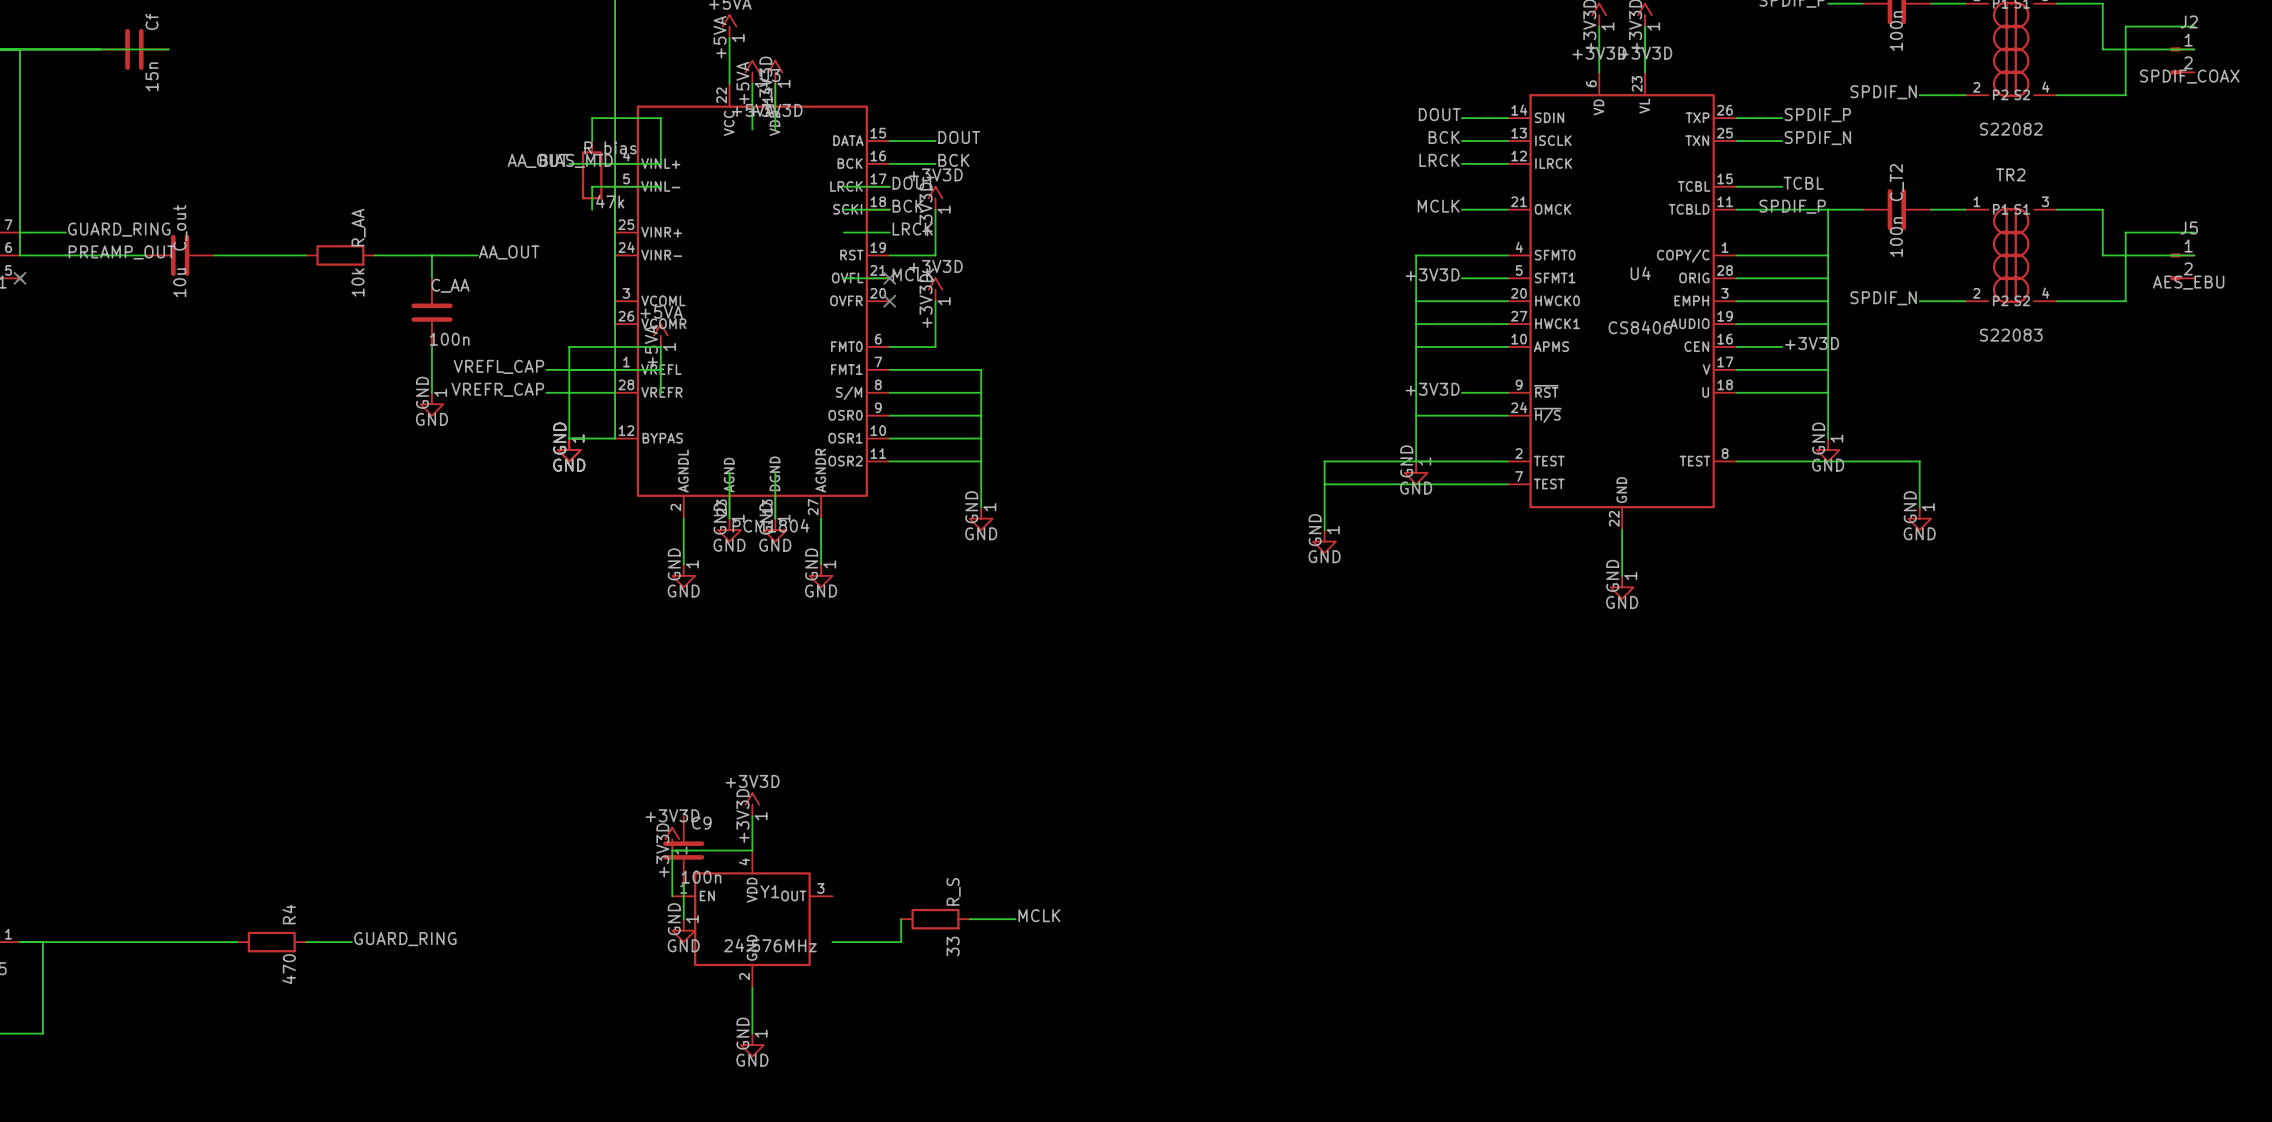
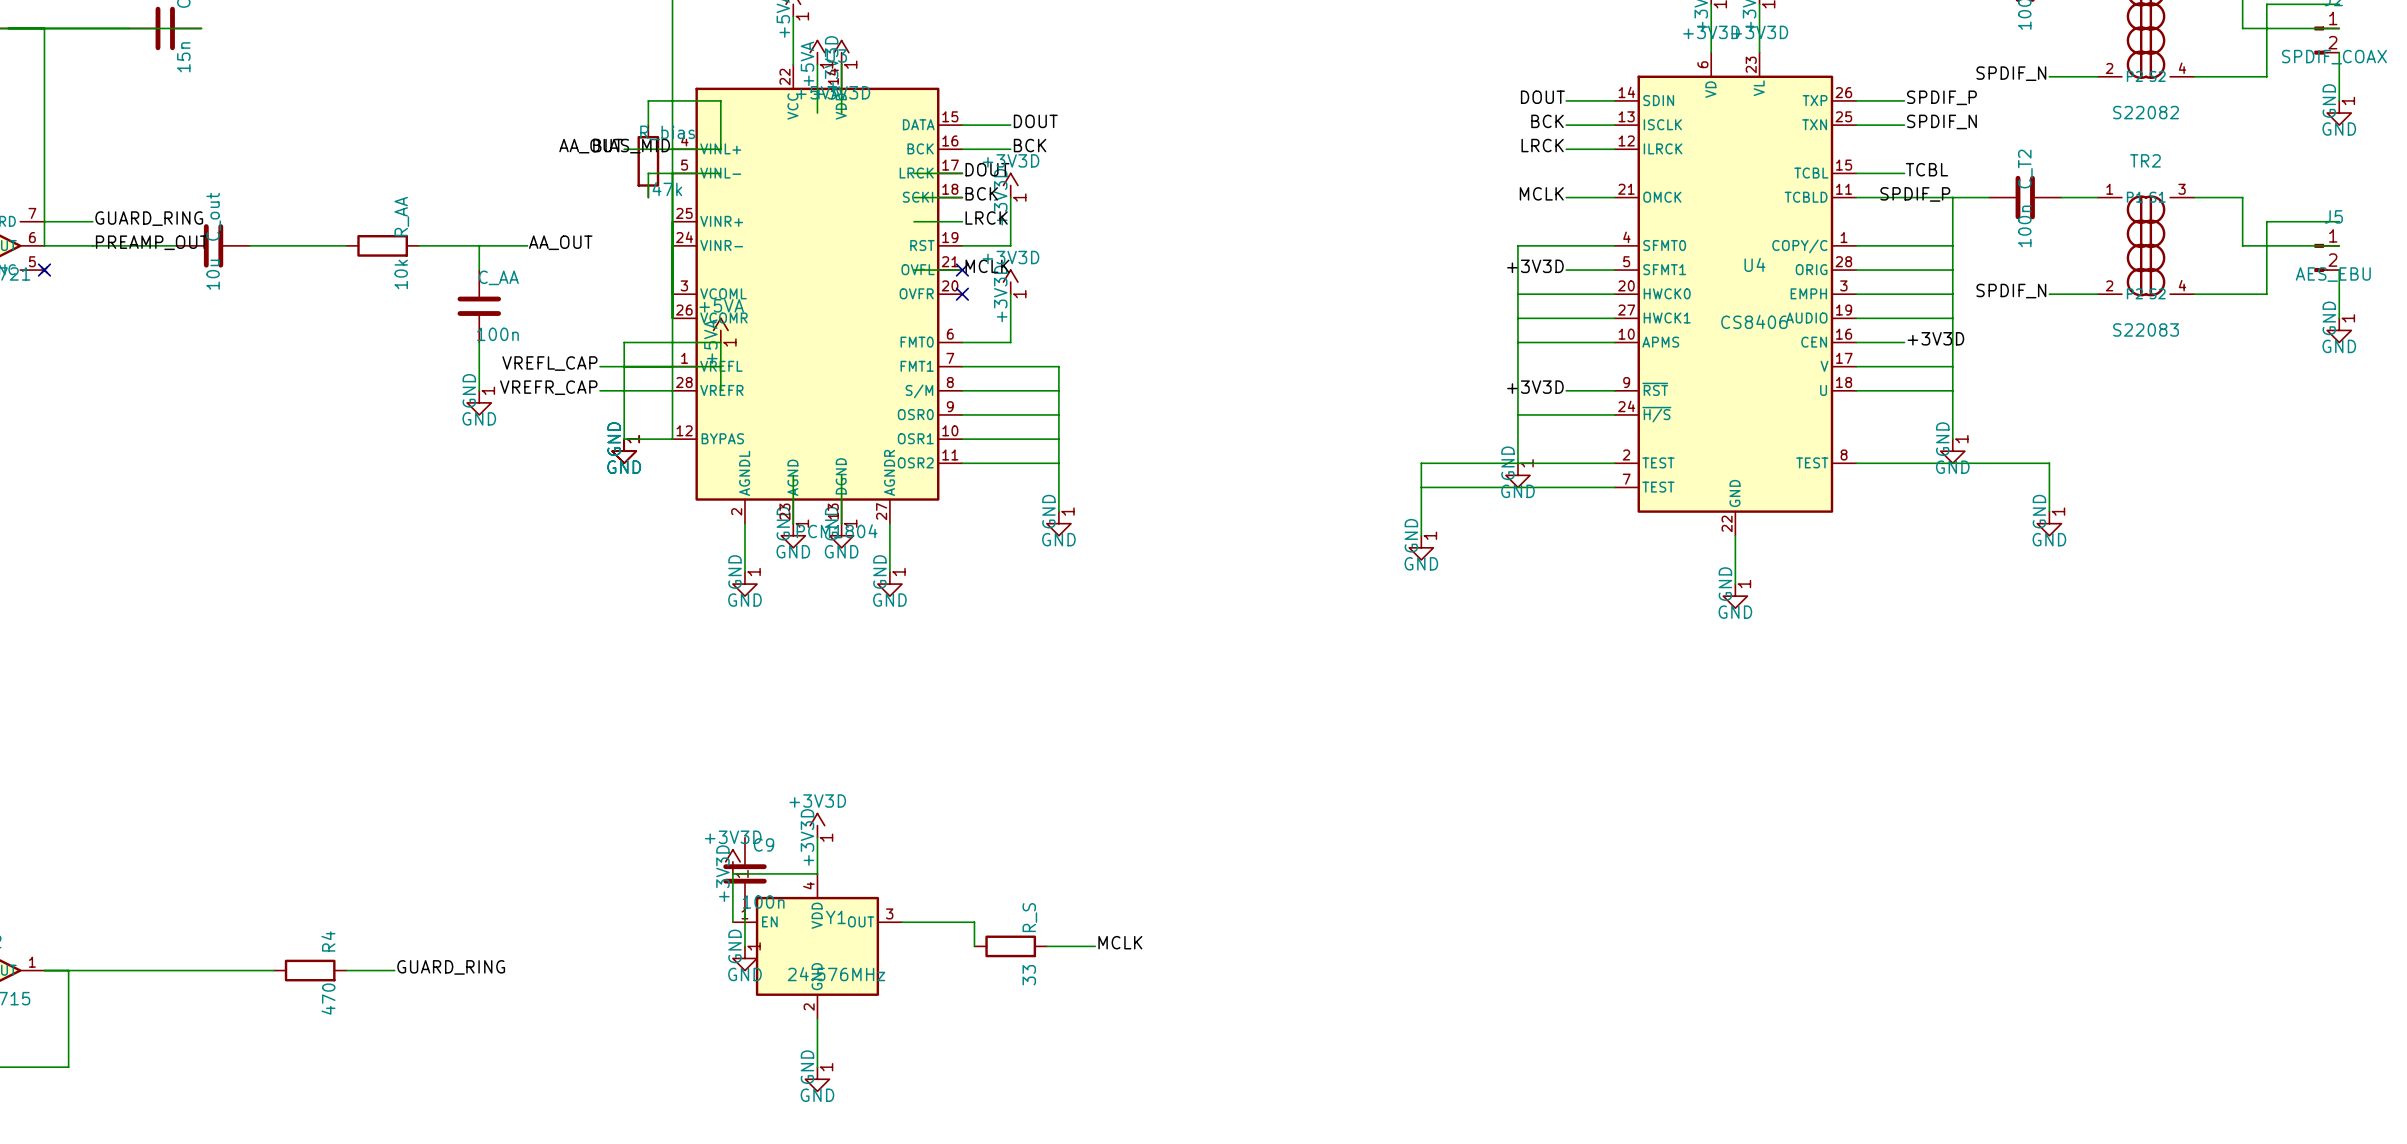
wire: none -> (2339, 52) (2339, 100)
power symbol: none -> GND (2339, 113)
wire: none -> (2339, 270) (2339, 318)
power symbol: none -> GND (2339, 330)
wire: (901, 919) (901, 942) (832, 942) -> (974, 946) (974, 922) (901, 922)

